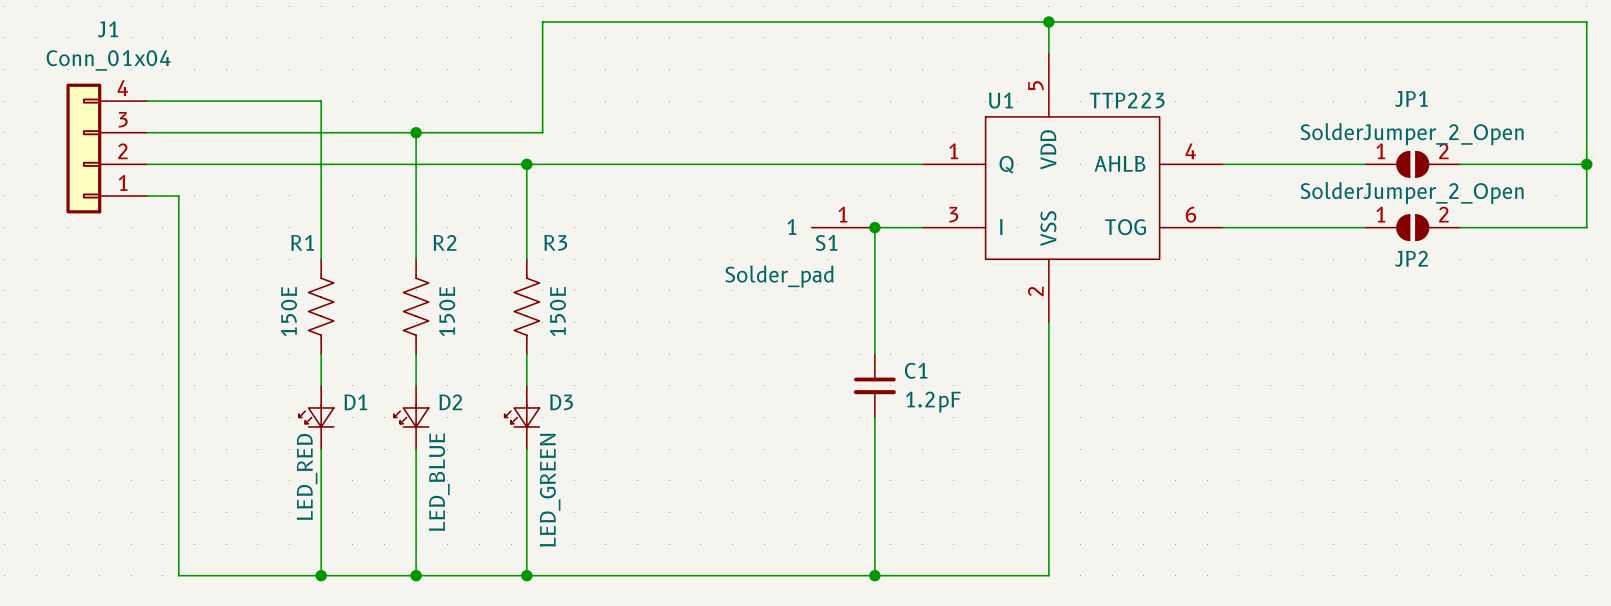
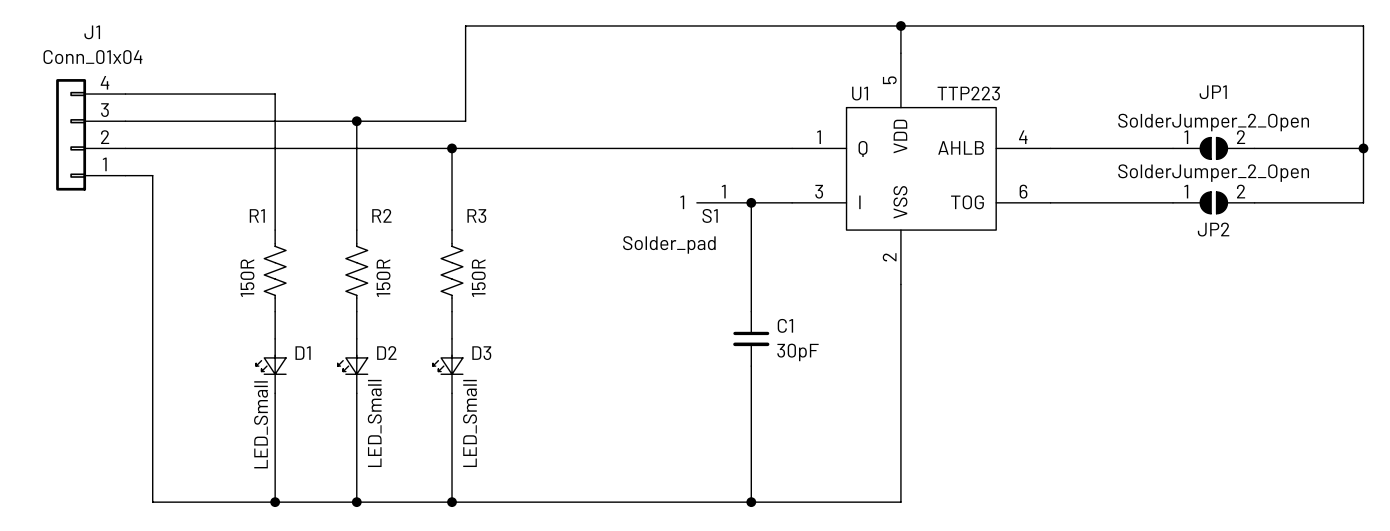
R1 value: 150E (289, 311) -> 150R (247, 278)
R2 value: 150E (447, 311) -> 150R (383, 278)
R3 value: 150E (557, 311) -> 150R (478, 278)
C1 value: 1.2pF (933, 402) -> 30pF (797, 352)
D1 value: LED_RED (307, 477) -> LED_Small (261, 424)
D2 value: LED_BLUE (439, 482) -> LED_Small (374, 423)
D3 value: LED_GREEN (550, 490) -> LED_Small (470, 423)

